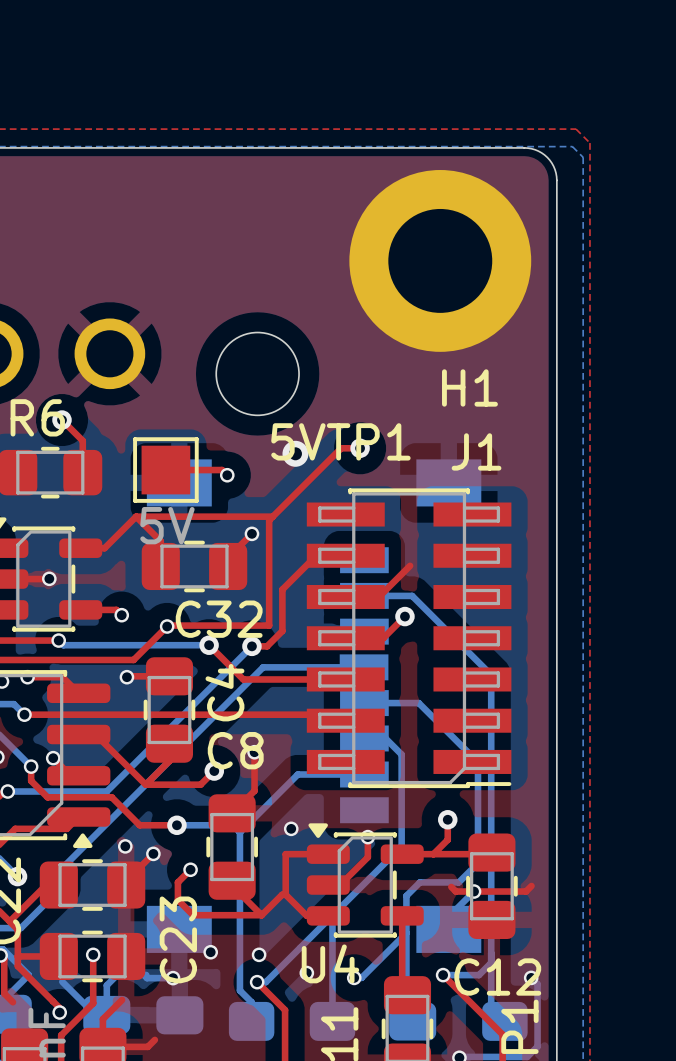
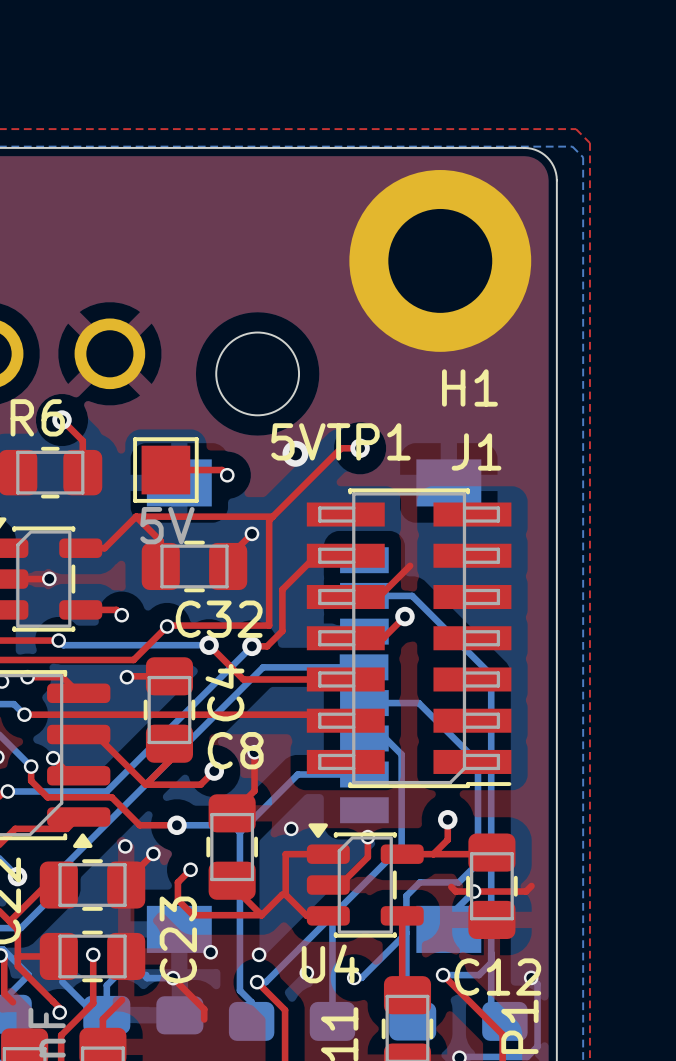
top track: none -> (173, 978) (204, 1009) (204, 1019)
top track: (154, 1039) (147, 1046) (102, 1046) -> none

